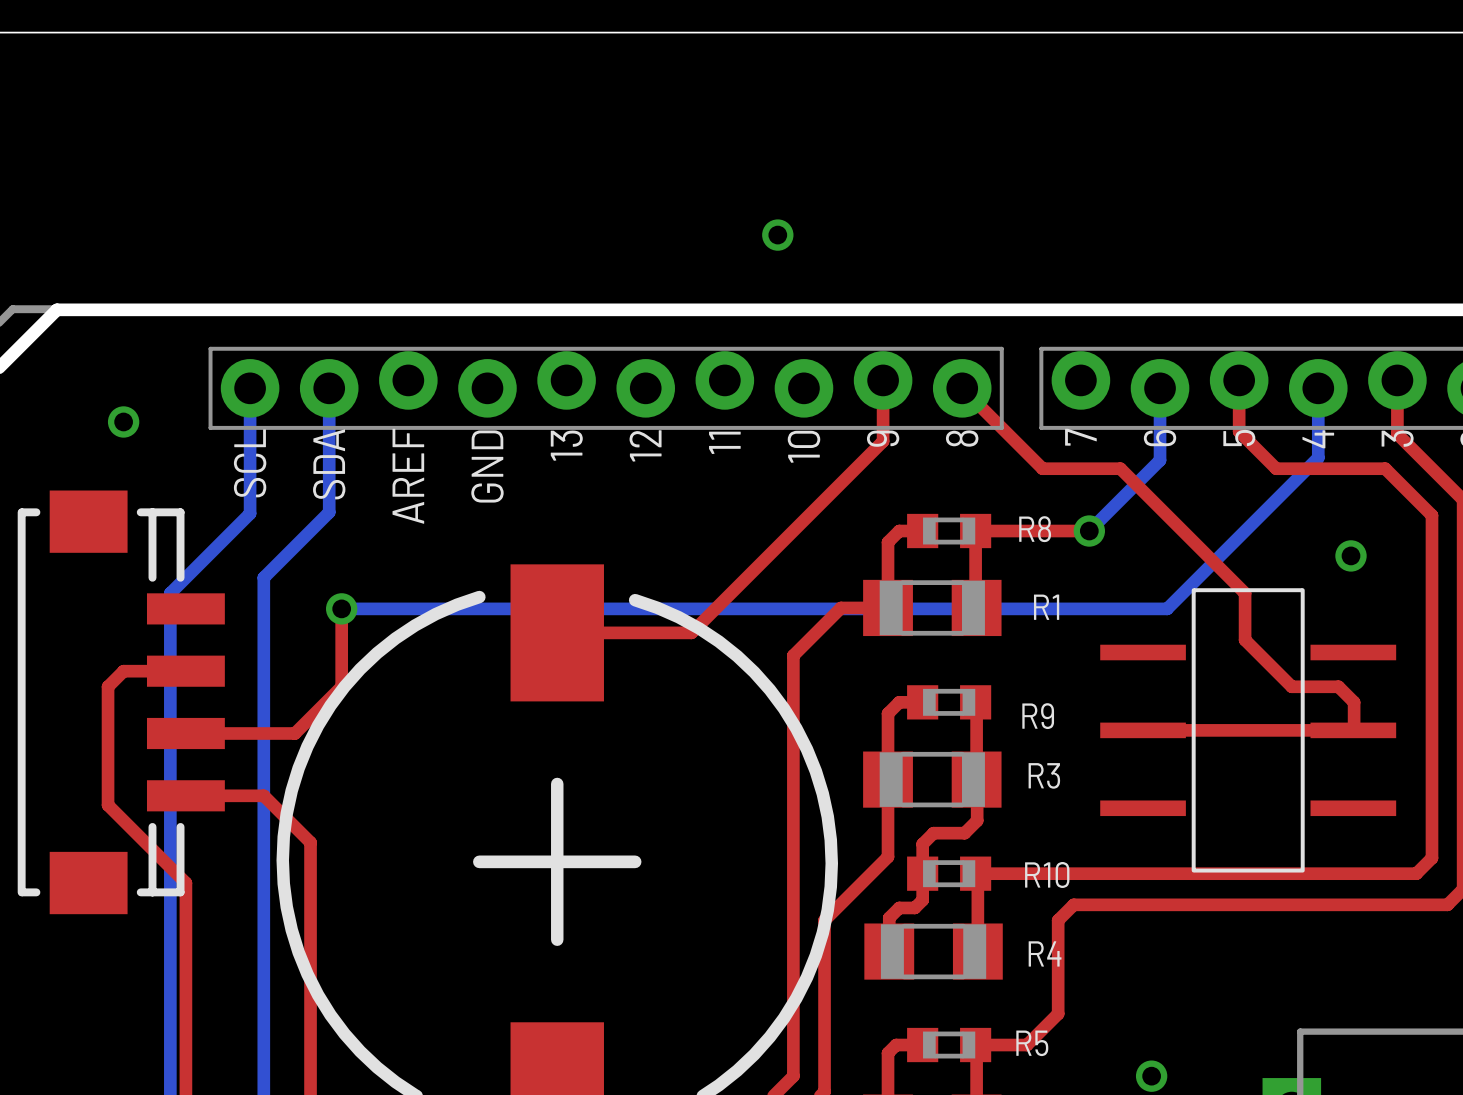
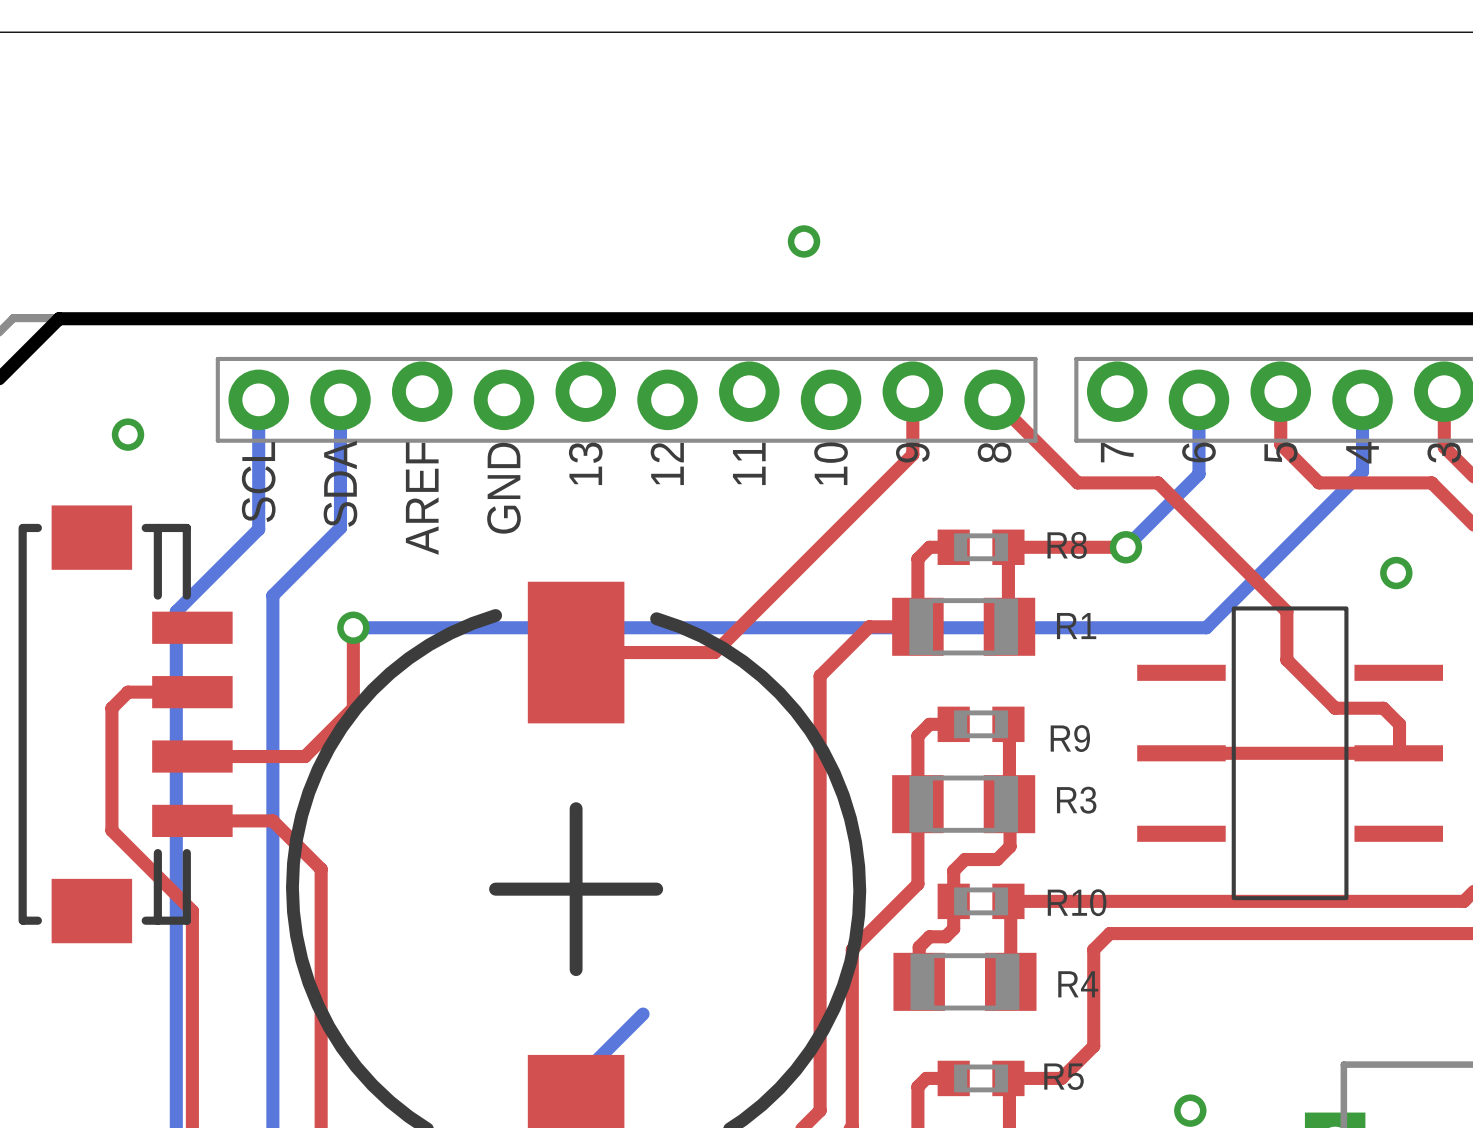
bottom track: none -> (643, 1014) (562, 1094)

